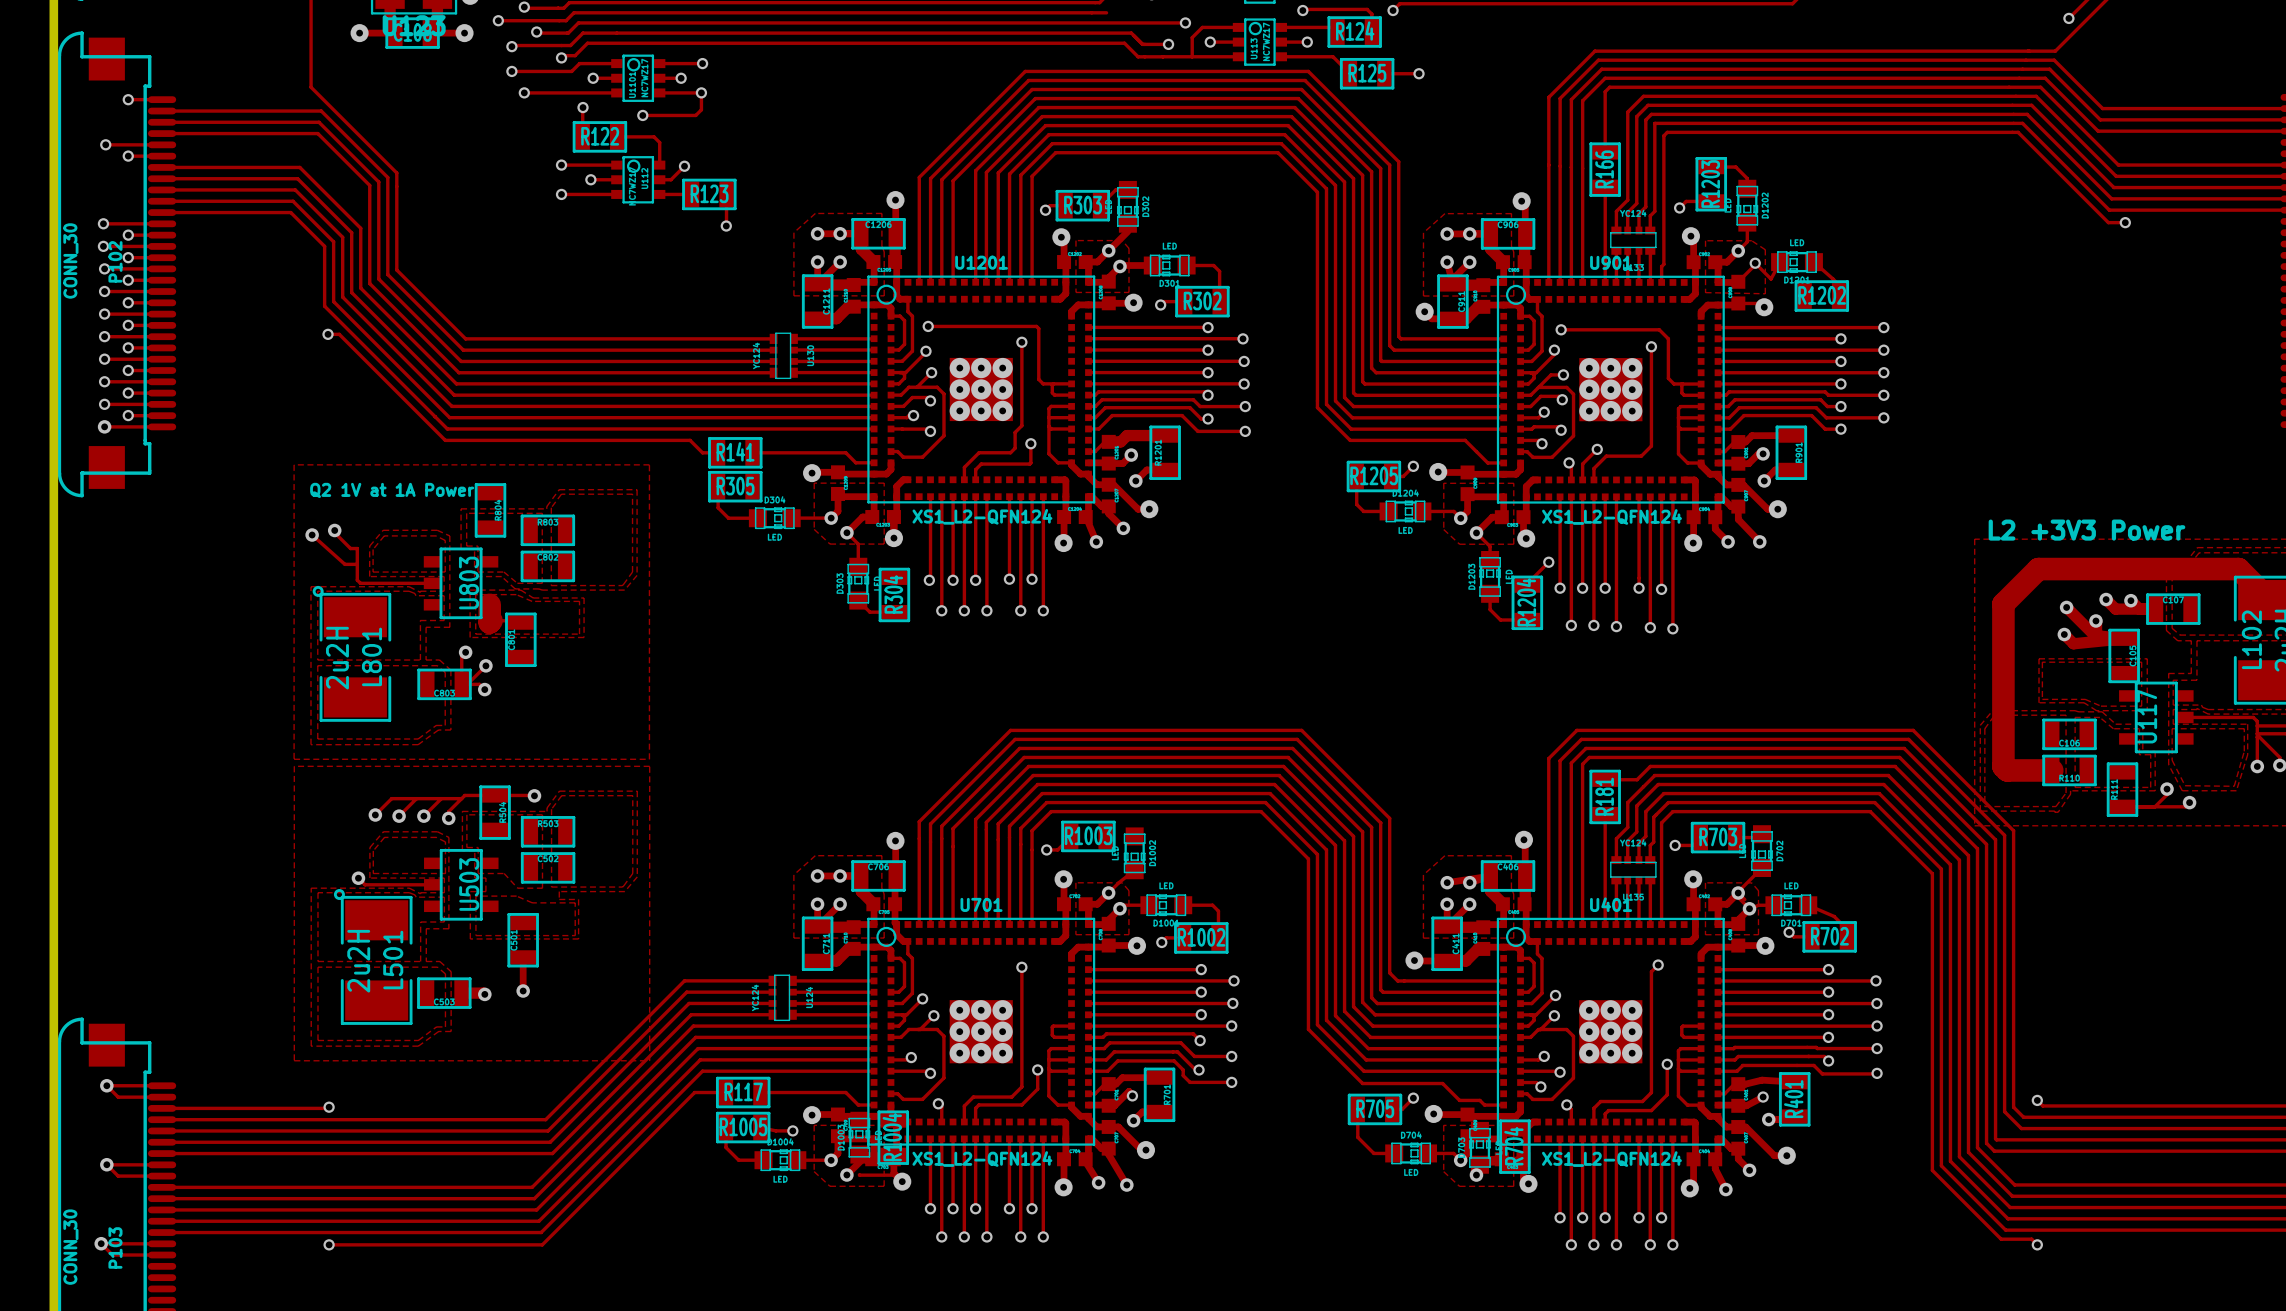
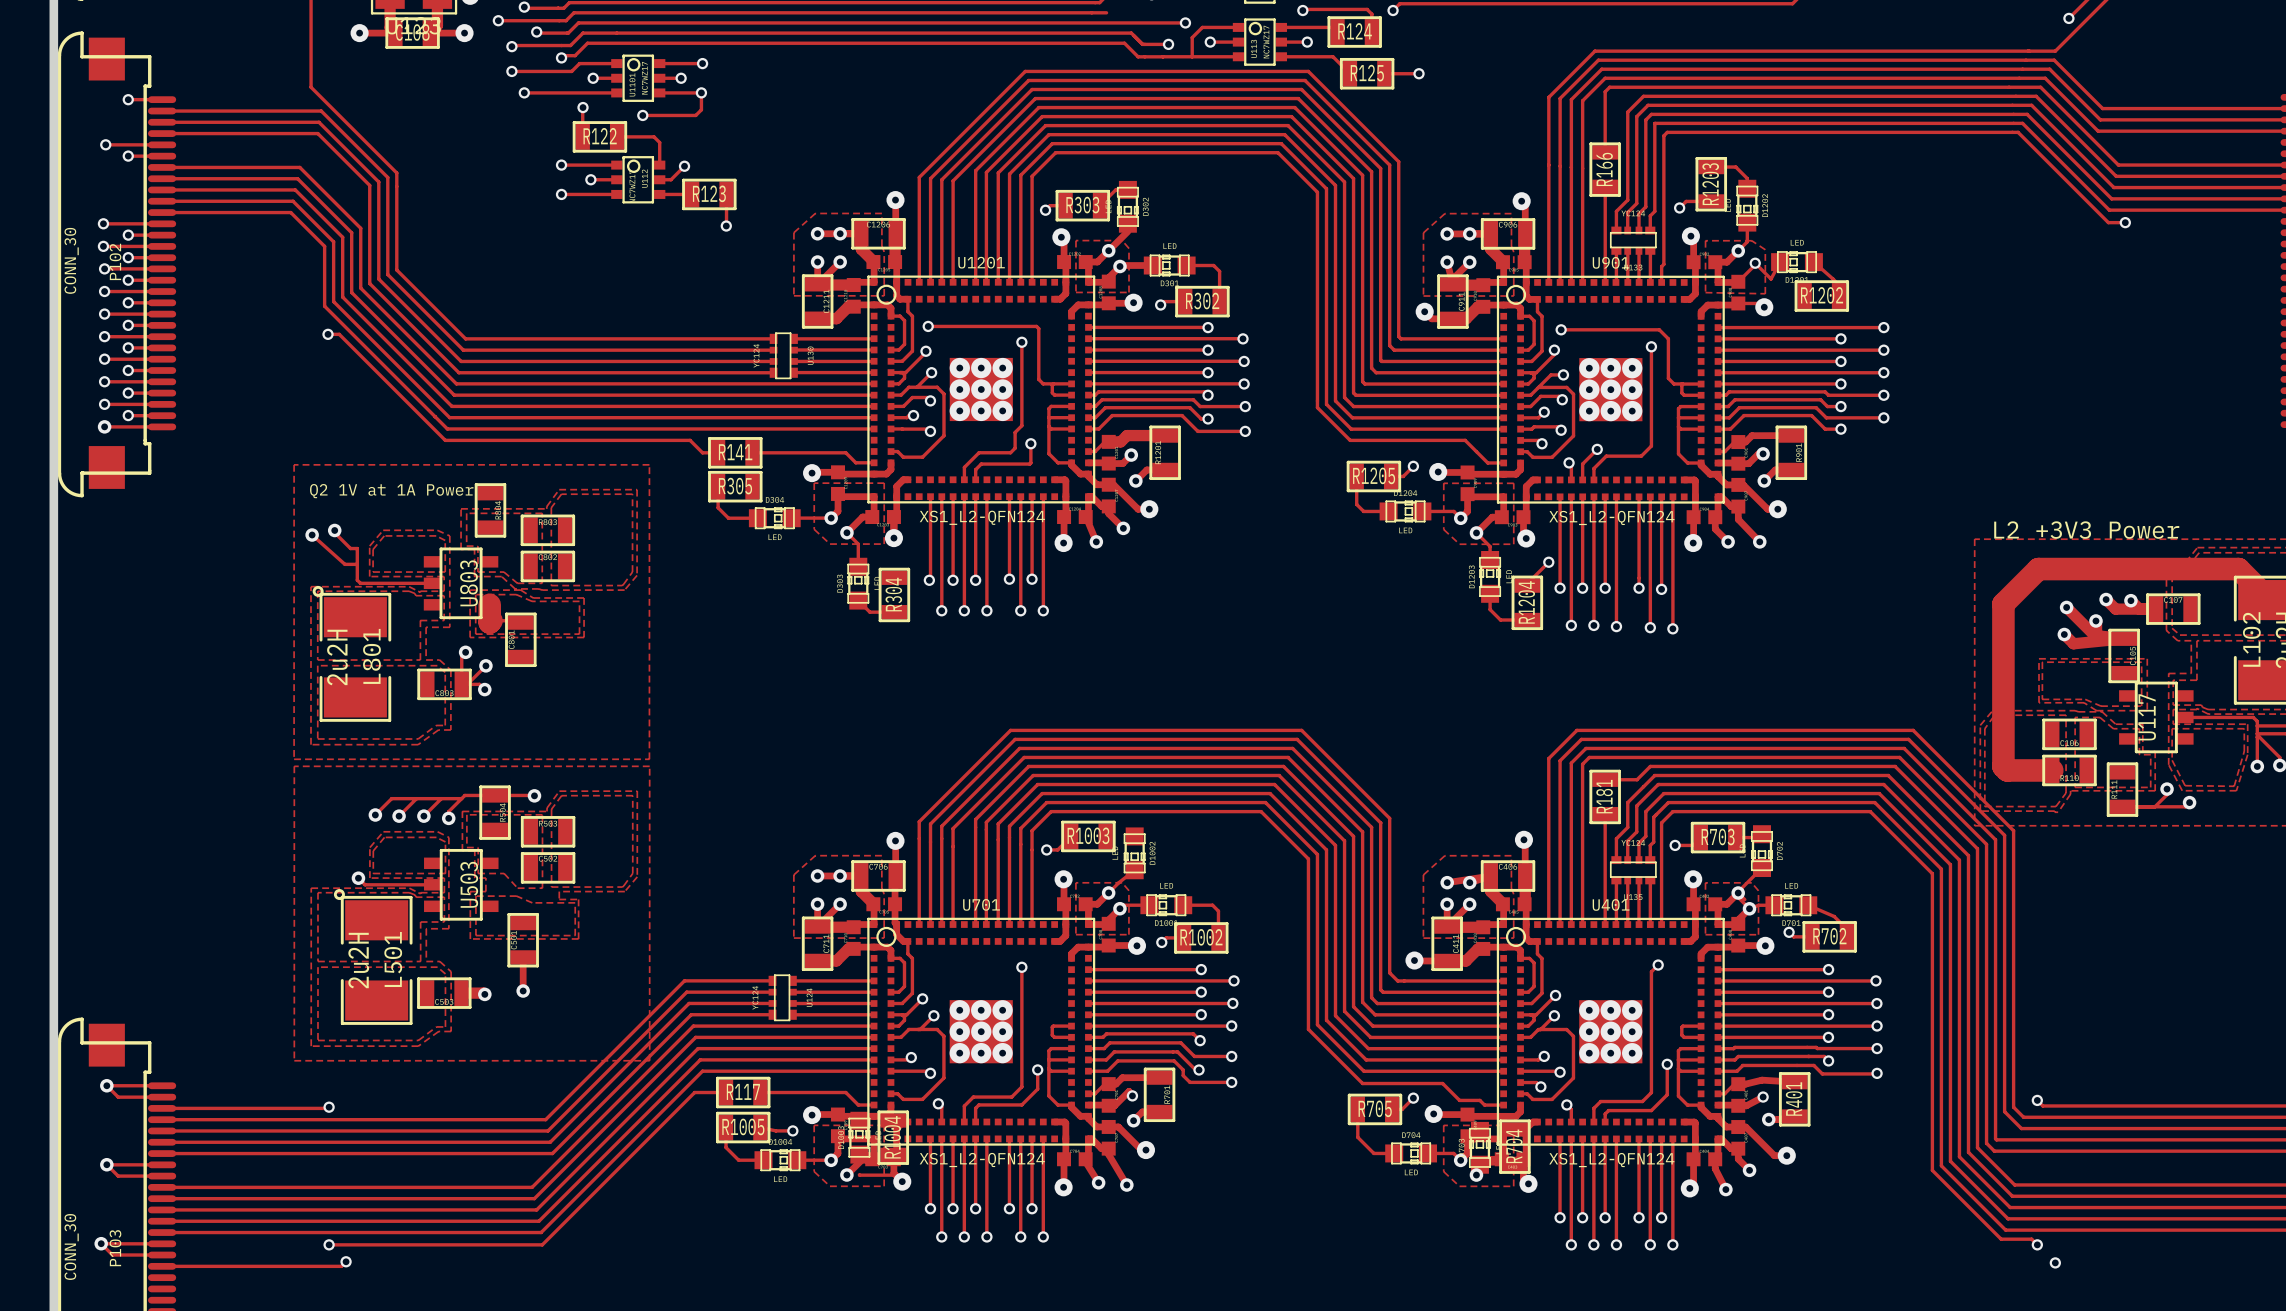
track: none -> (346, 1261) (341, 1266) (162, 1266)
via: none -> (346, 1261)
via: none -> (2055, 1262)

